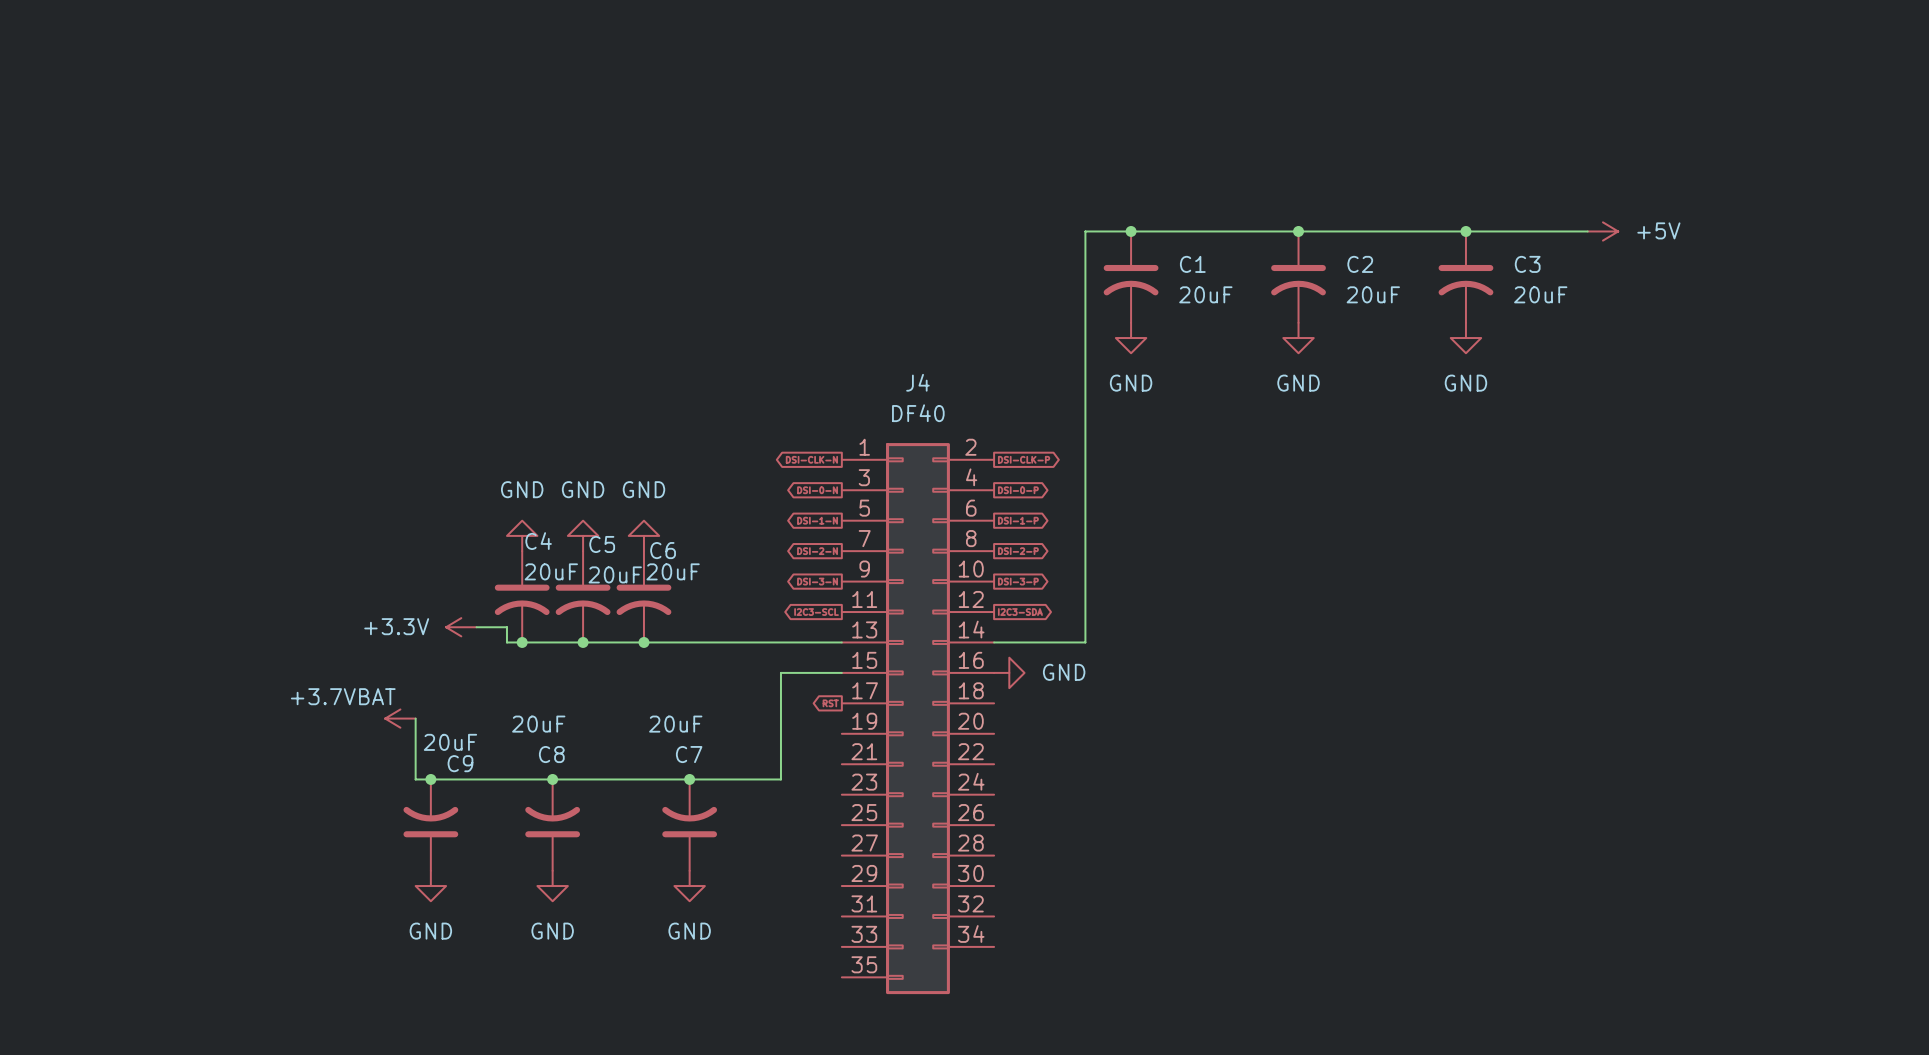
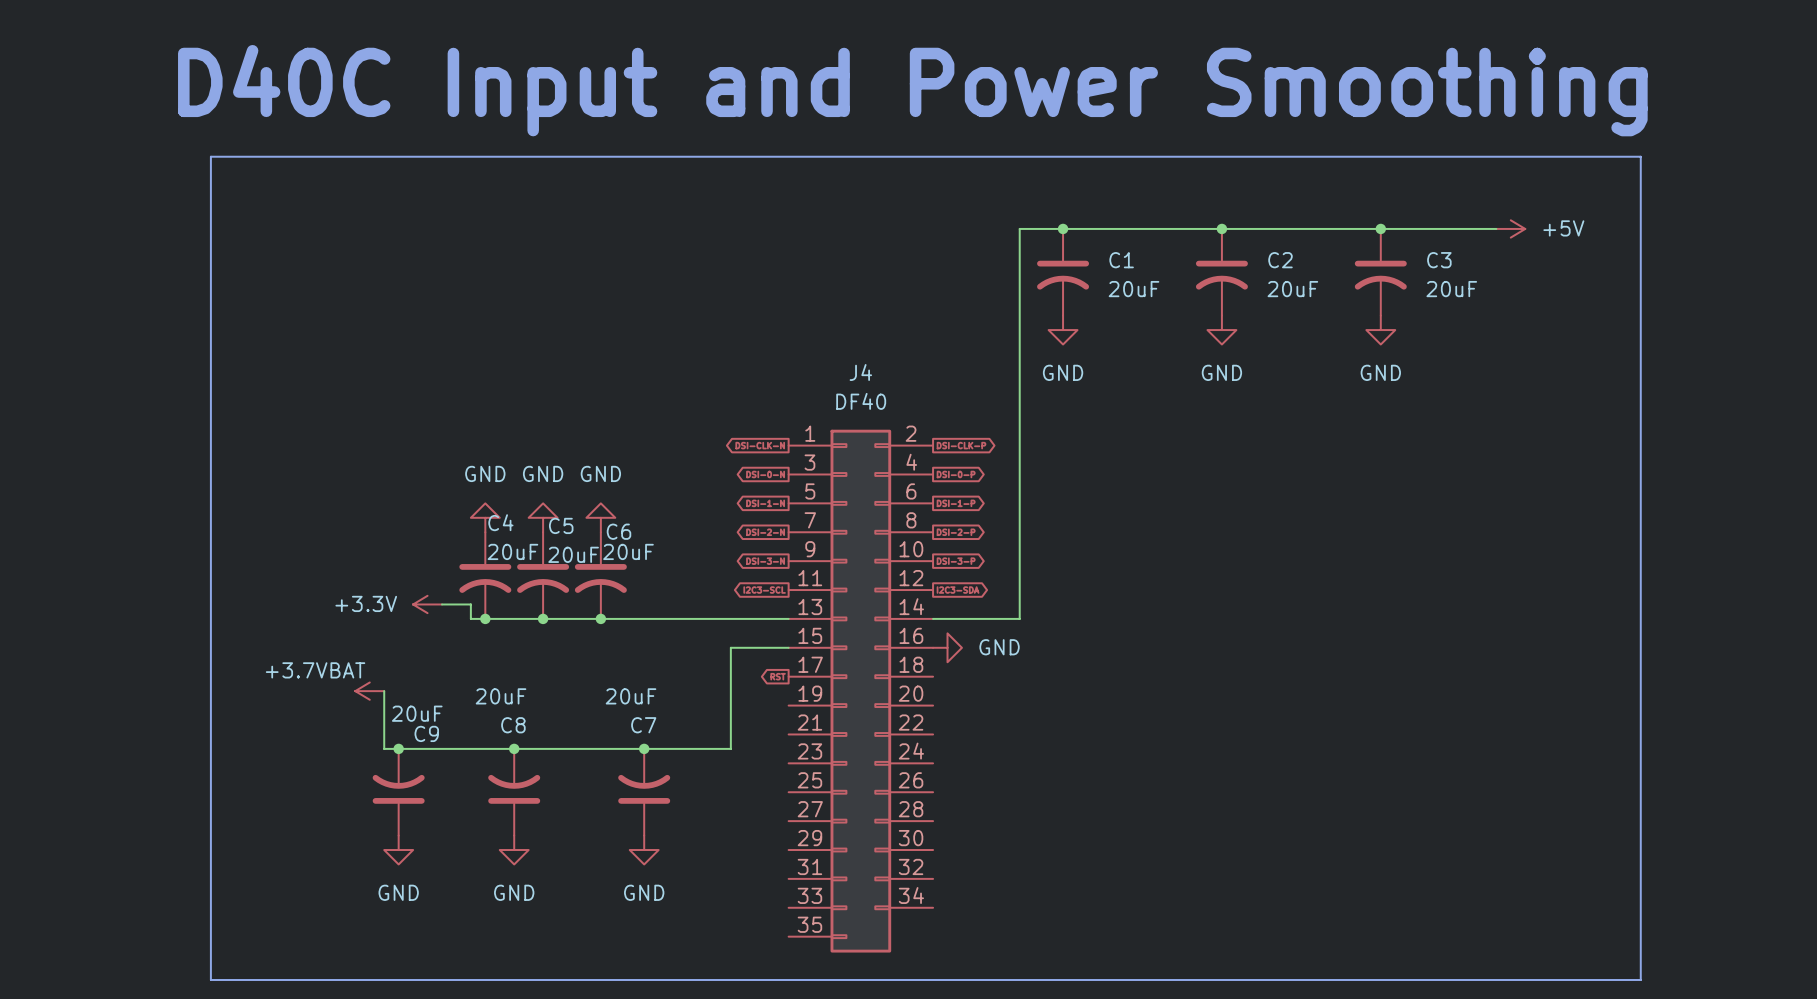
text: none -> D40C Input and Power Smoothing (912, 90)
line: none -> (210, 156) (1640, 156) (1640, 979) (210, 979) (210, 156)

